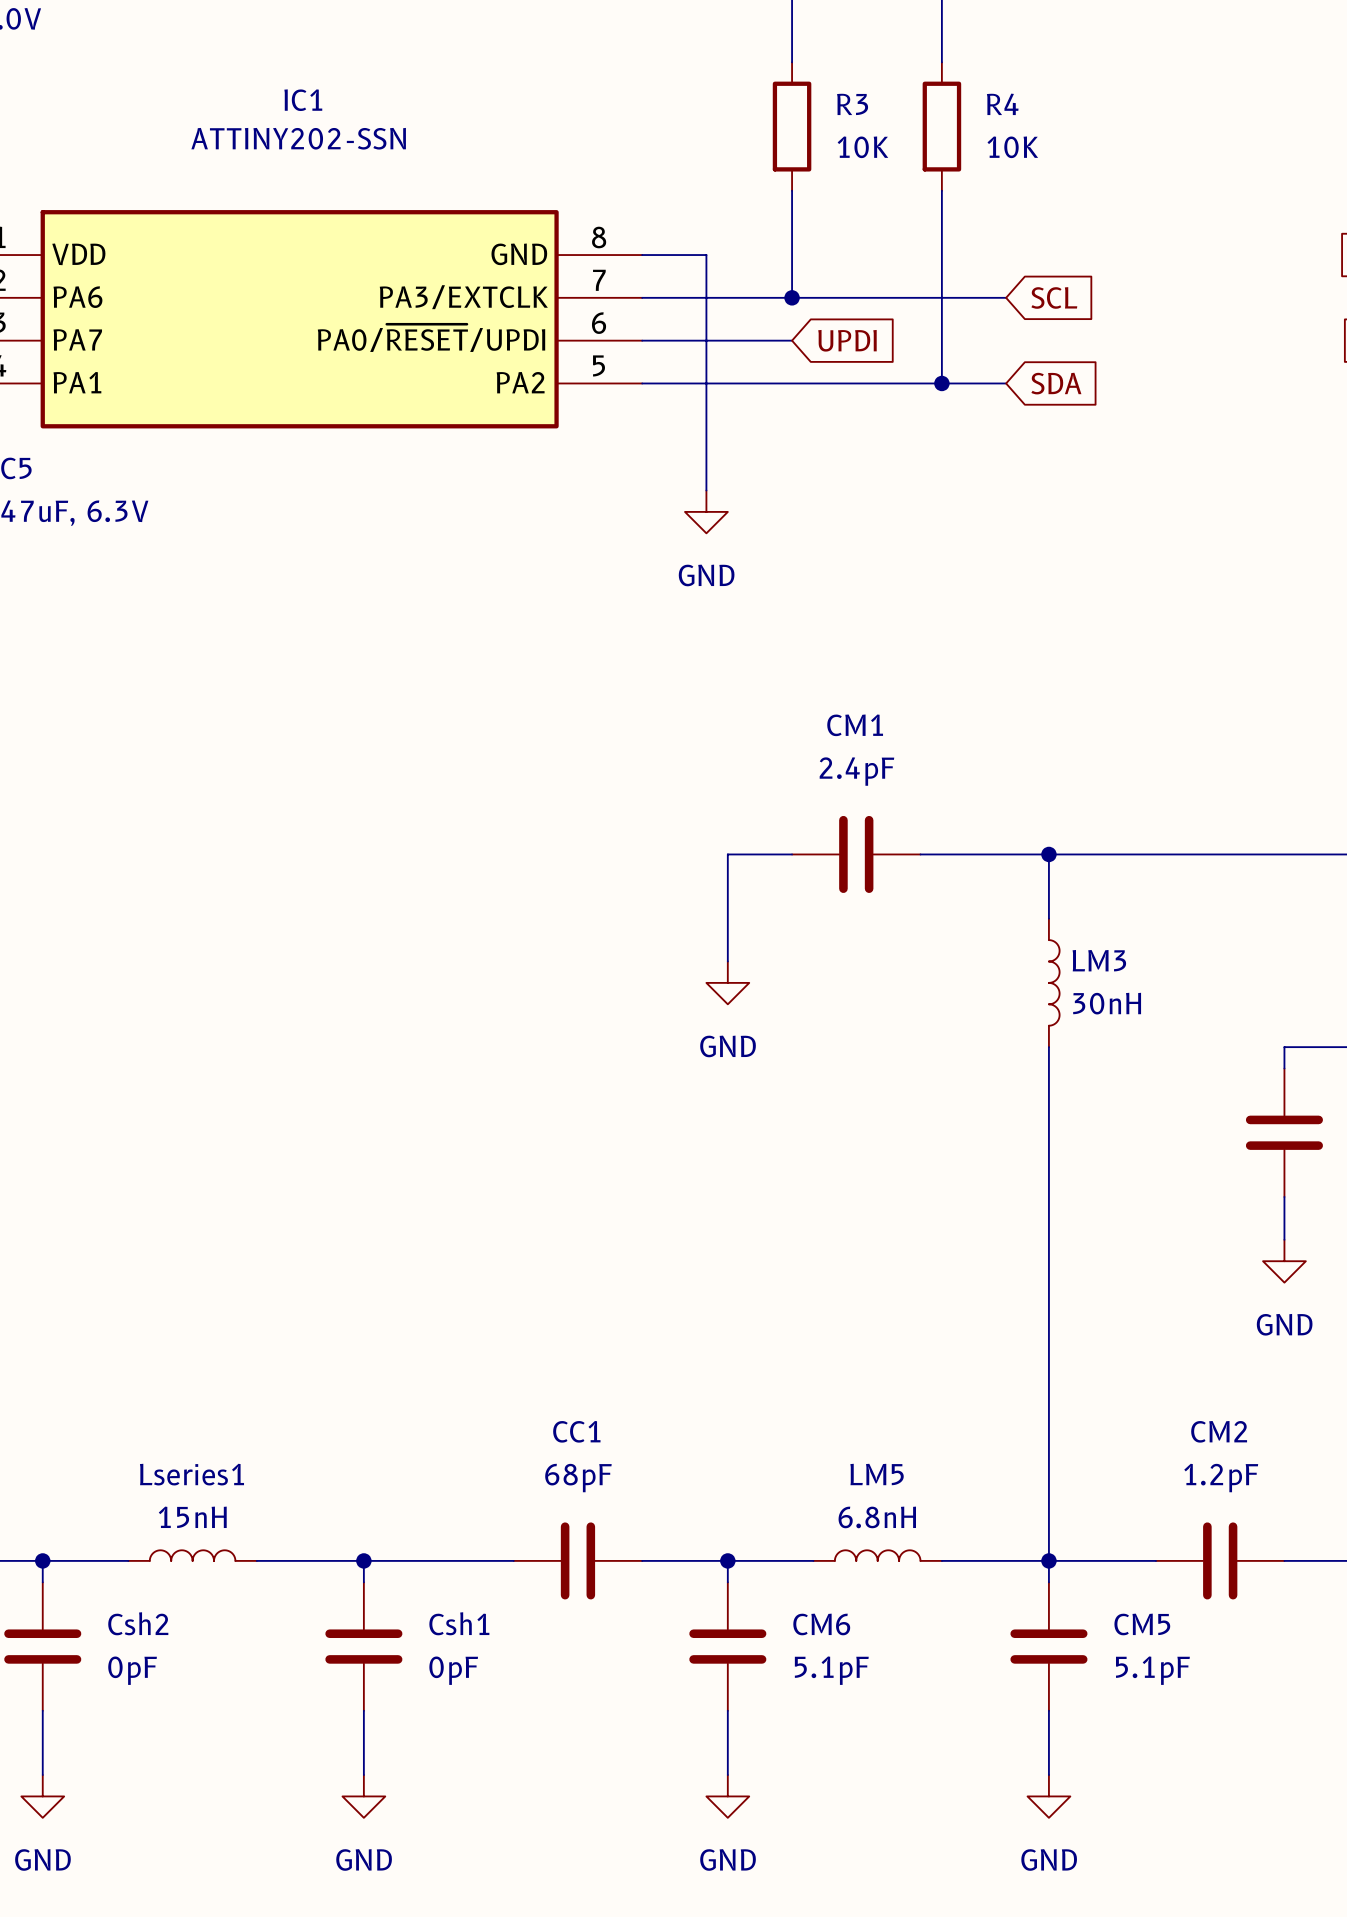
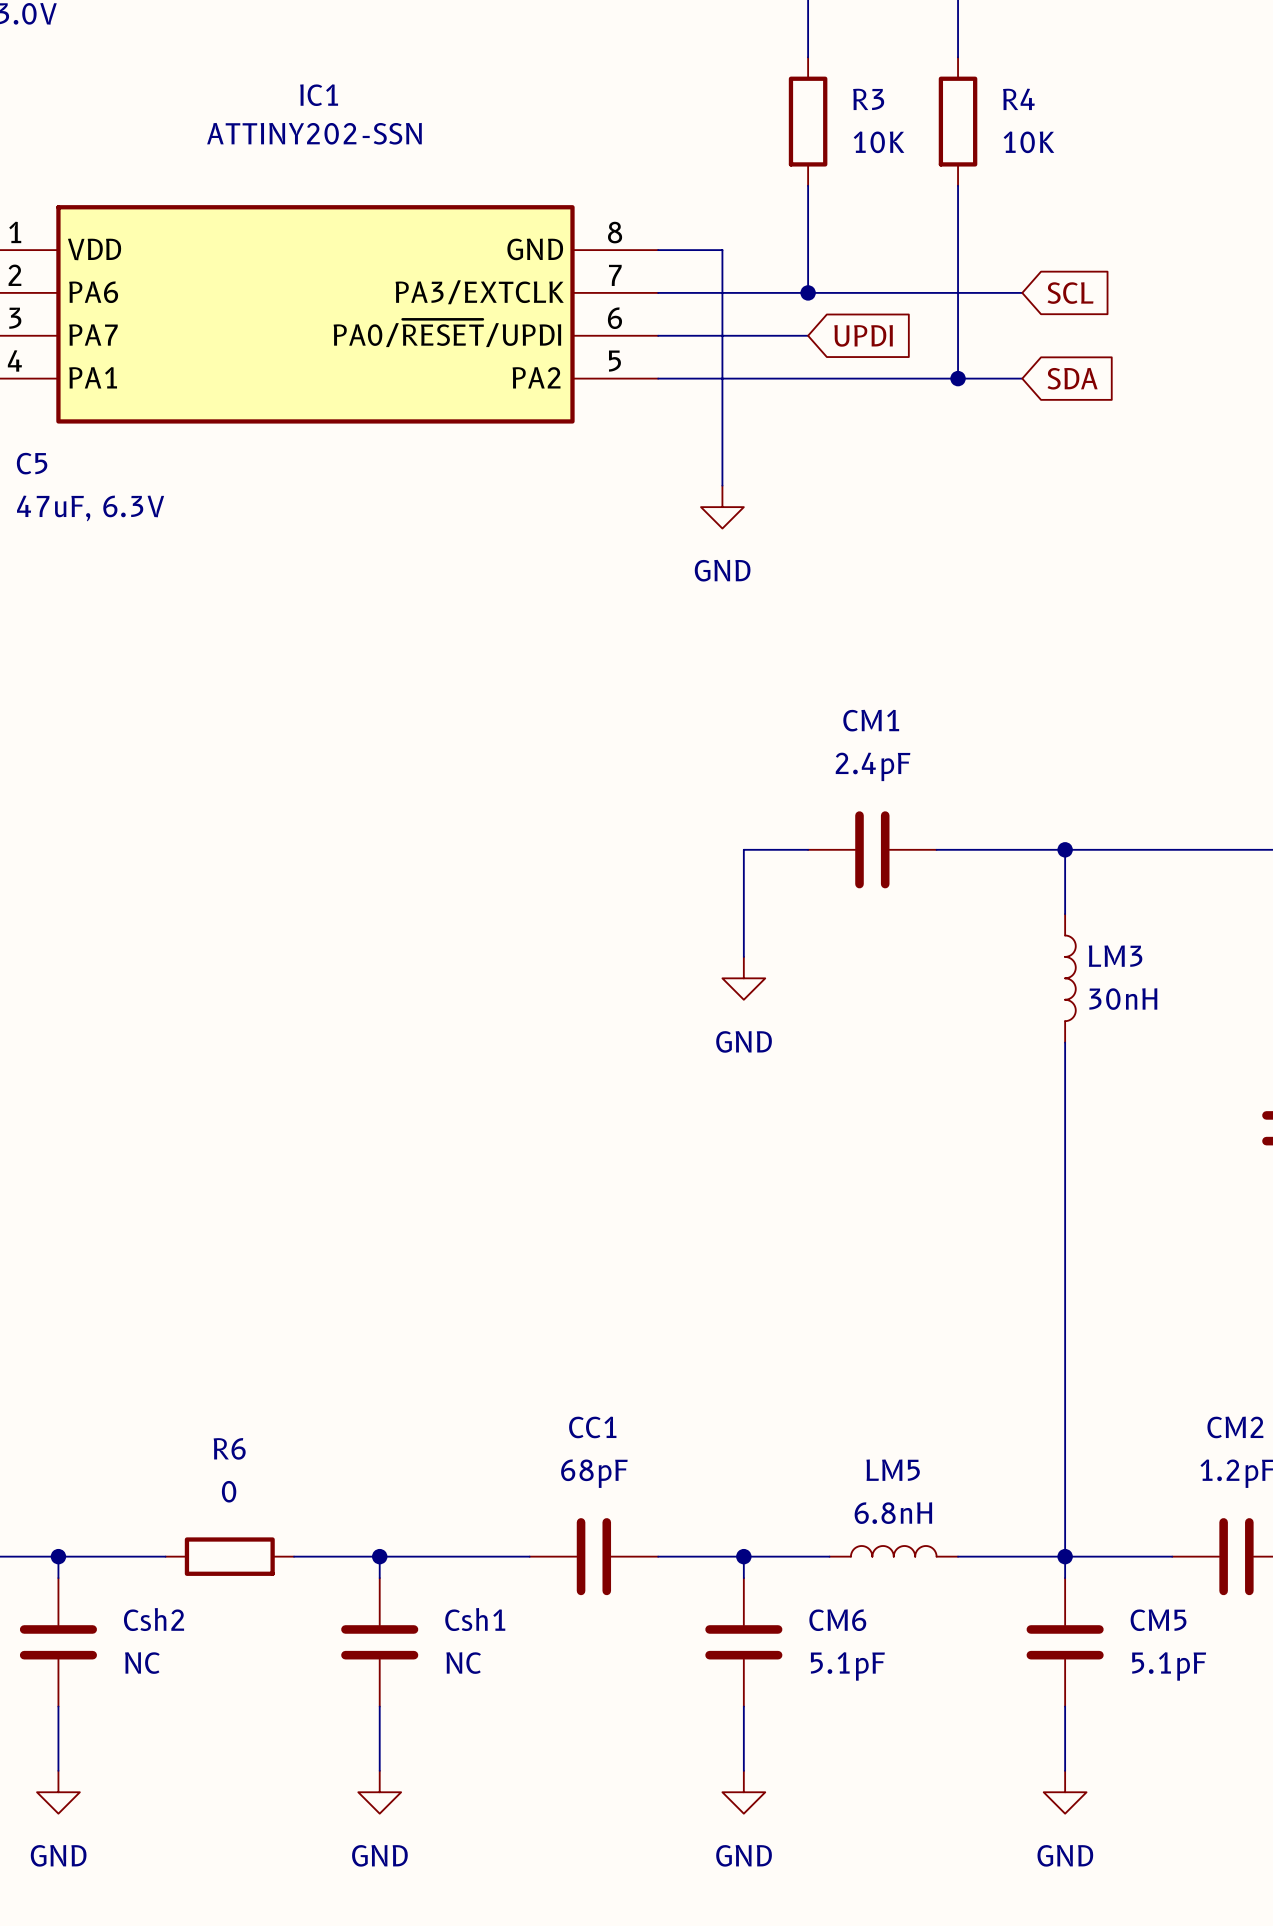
Lseries1: 15nH (192, 1555) -> none
R6: none -> 0 (229, 1556)
Csh2 value: 0pF (132, 1670) -> NC (142, 1663)
Csh1 value: 0pF (453, 1670) -> NC (463, 1663)

